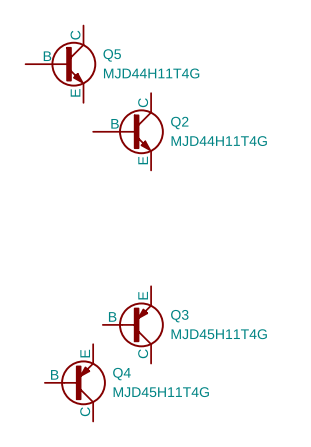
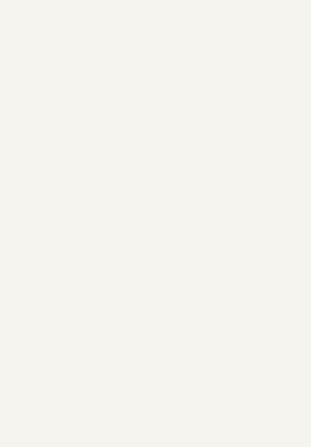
Q5: MJD44H11T4G (60, 64) -> none
Q2: MJD44H11T4G (128, 131) -> none
Q3: MJD45H11T4G (133, 324) -> none
Q4: MJD45H11T4G (75, 382) -> none

